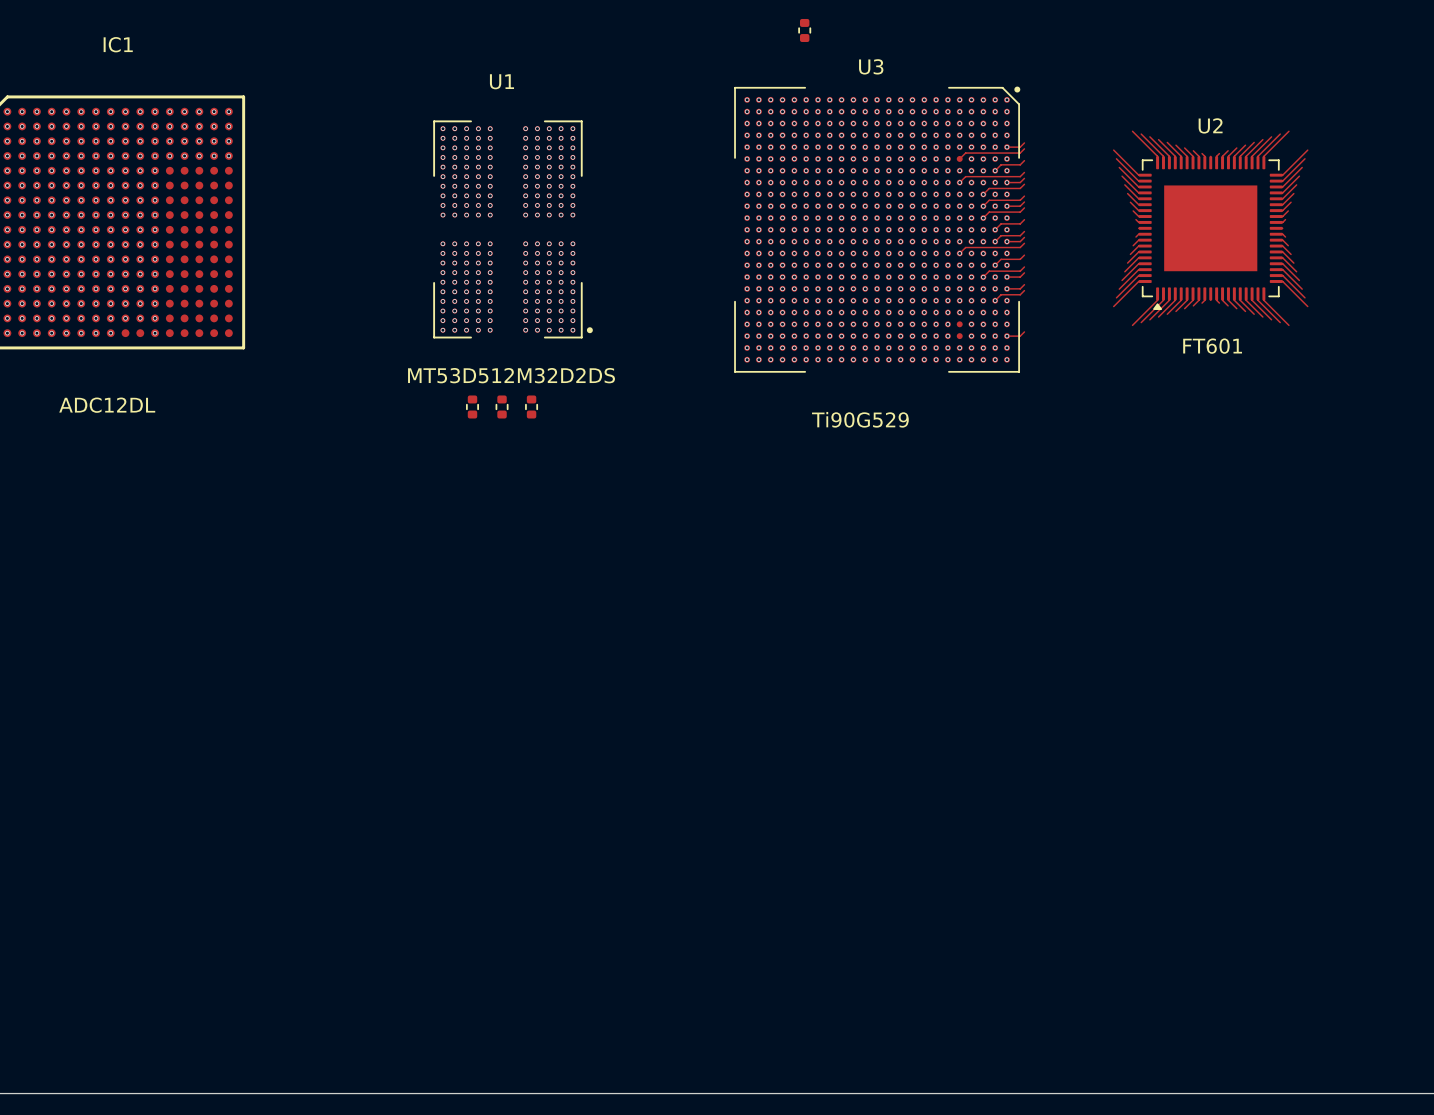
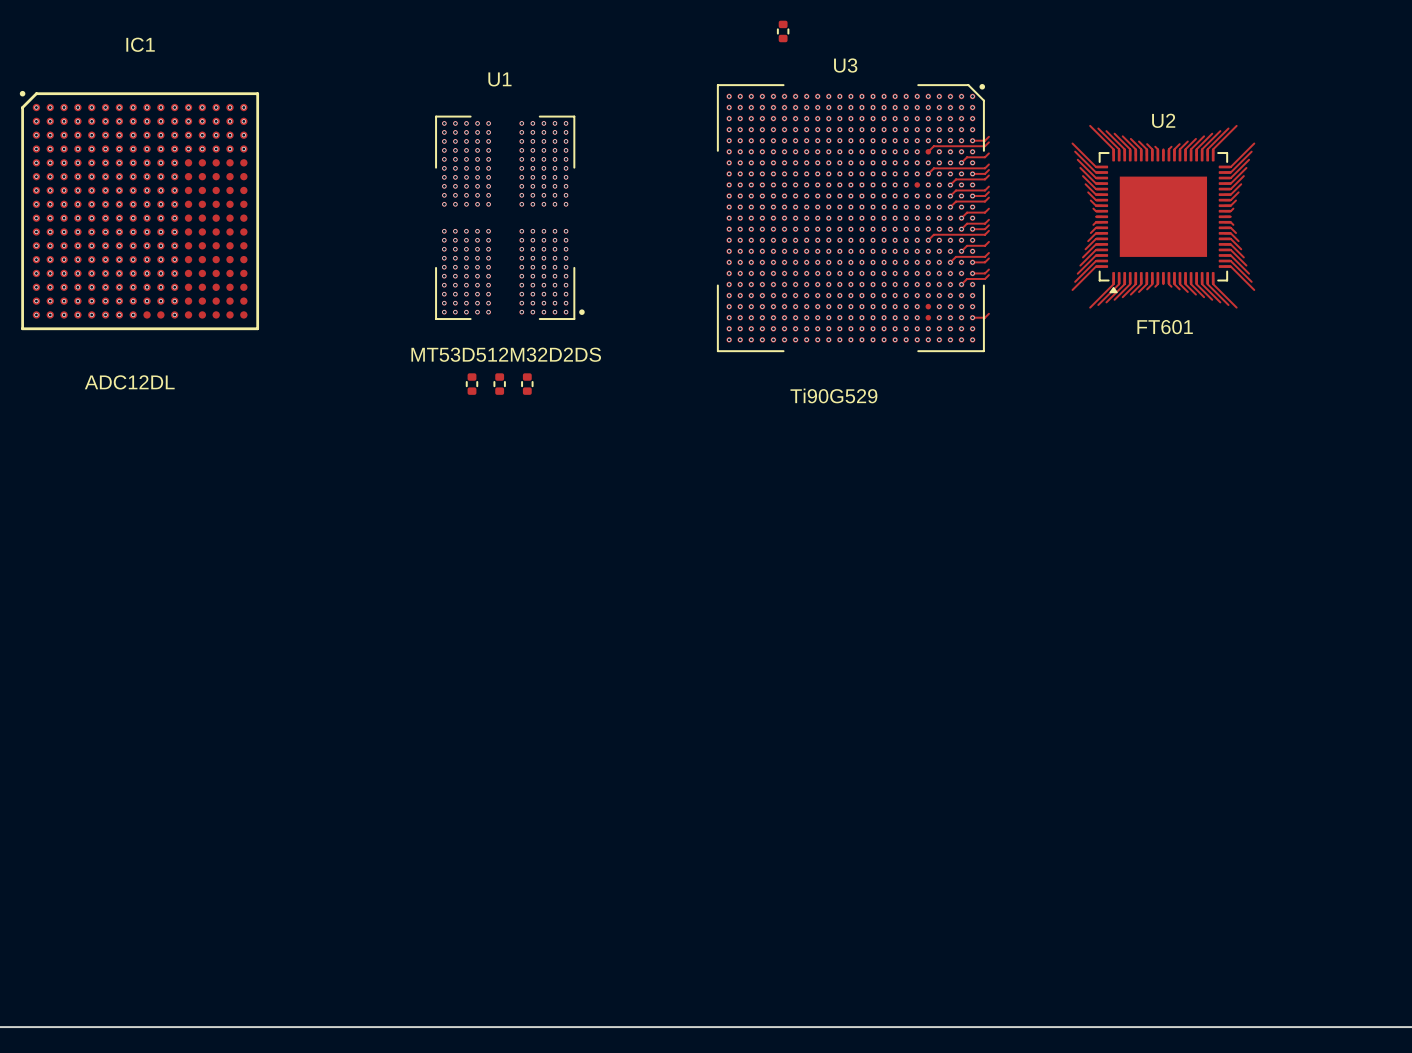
via: (947, 194) -> none

